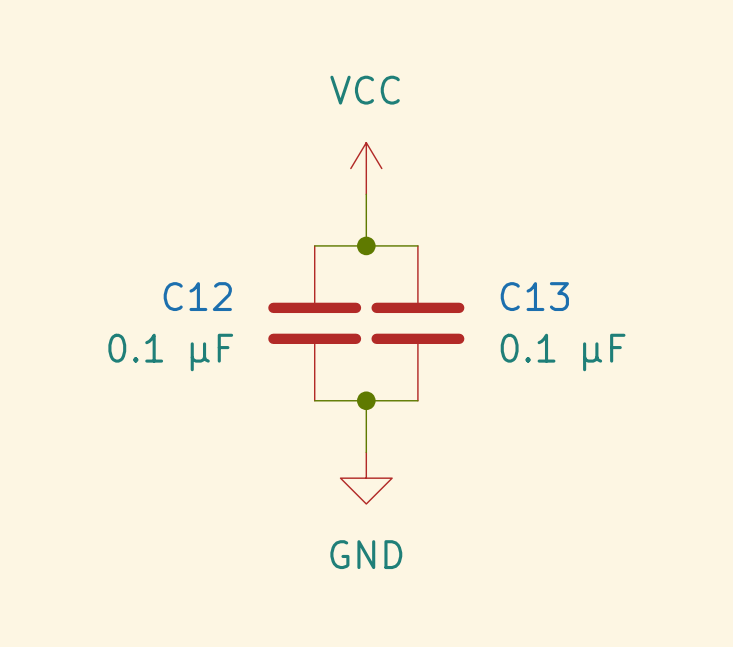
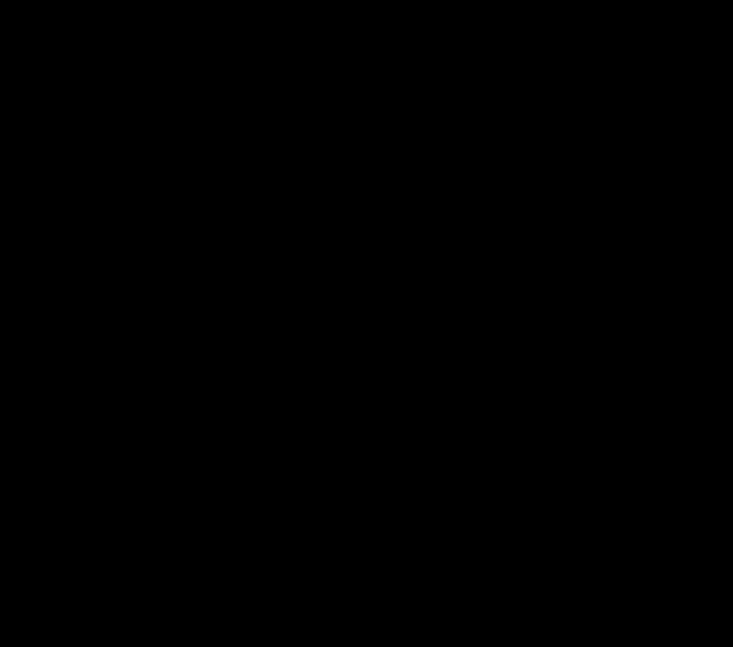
power symbol: VCC (366, 168) -> none
wire: (366, 194) (366, 245) -> none
wire: (314, 245) (417, 245) -> none
junction: (366, 245) -> none
C12: 0.1 µF (314, 323) -> none
C13: 0.1 µF (417, 323) -> none
wire: (314, 400) (417, 400) -> none
wire: (366, 400) (366, 452) -> none
junction: (366, 400) -> none
power symbol: GND (366, 478) -> none

